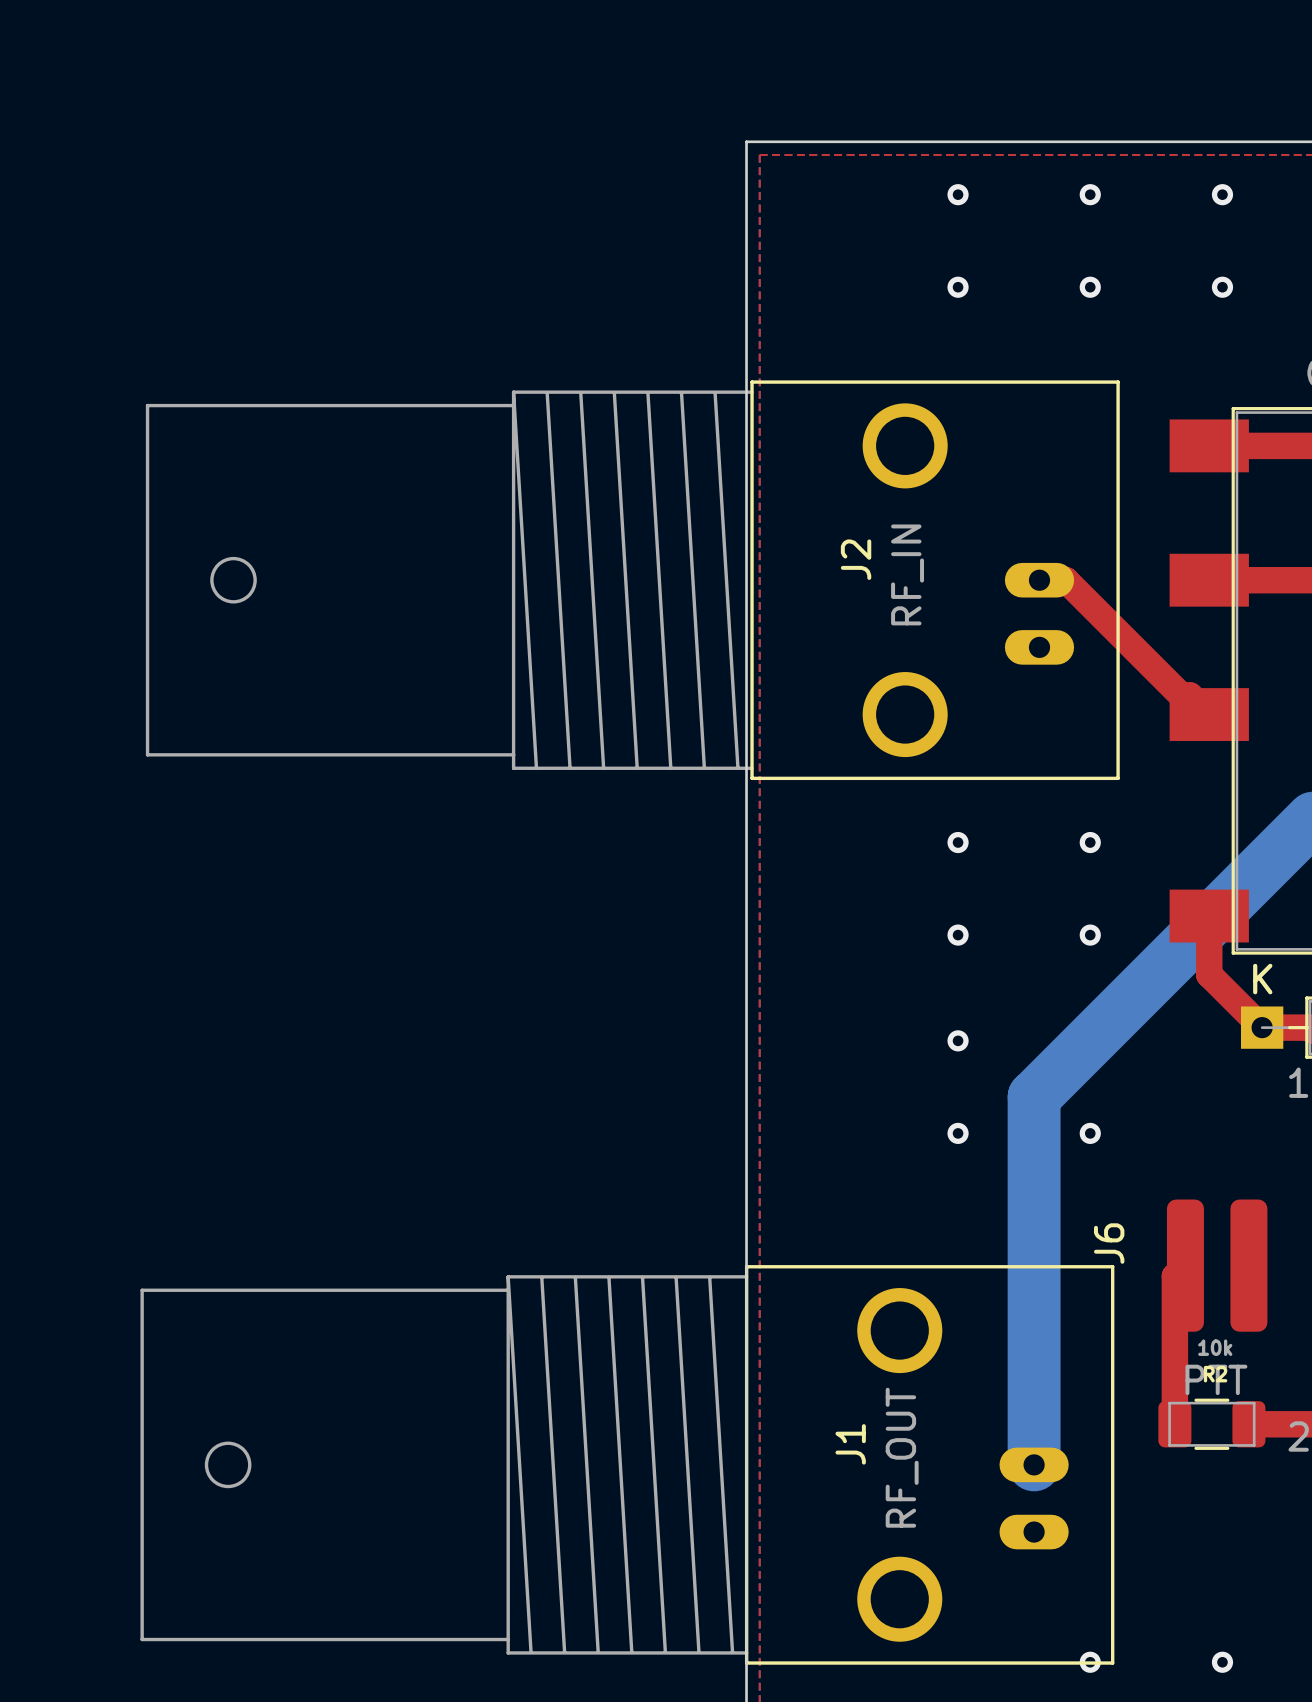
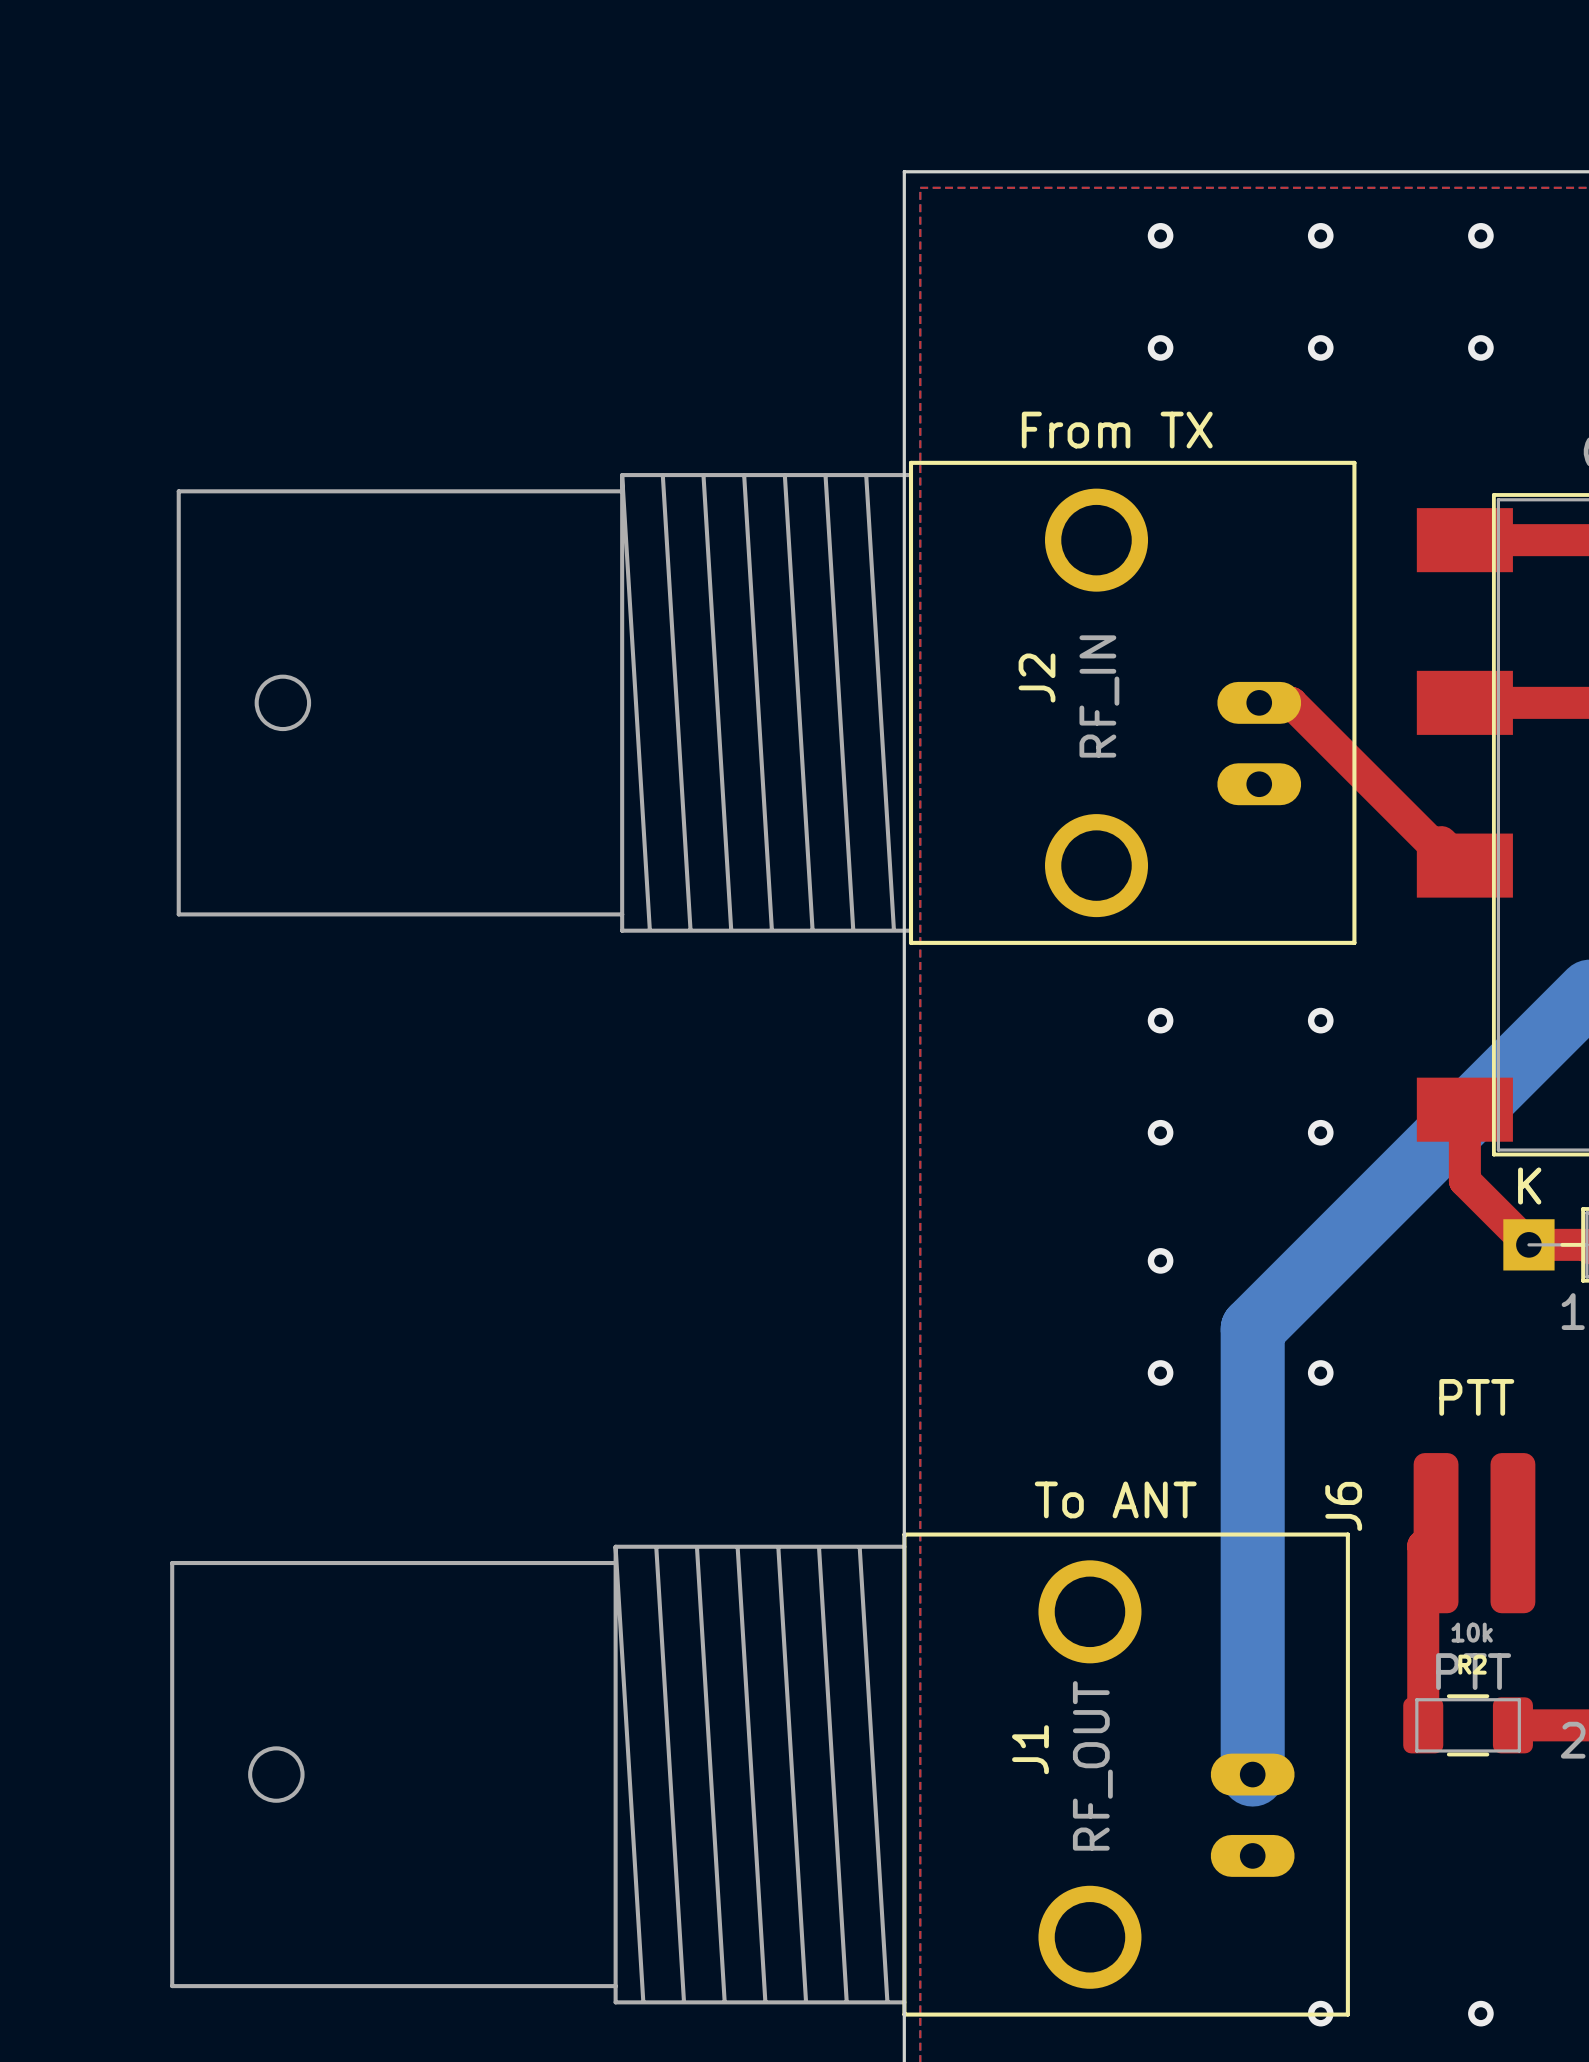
text: none -> From TX (1117, 430)
text: none -> PTT (1476, 1397)
text: none -> To ANT (1115, 1499)

